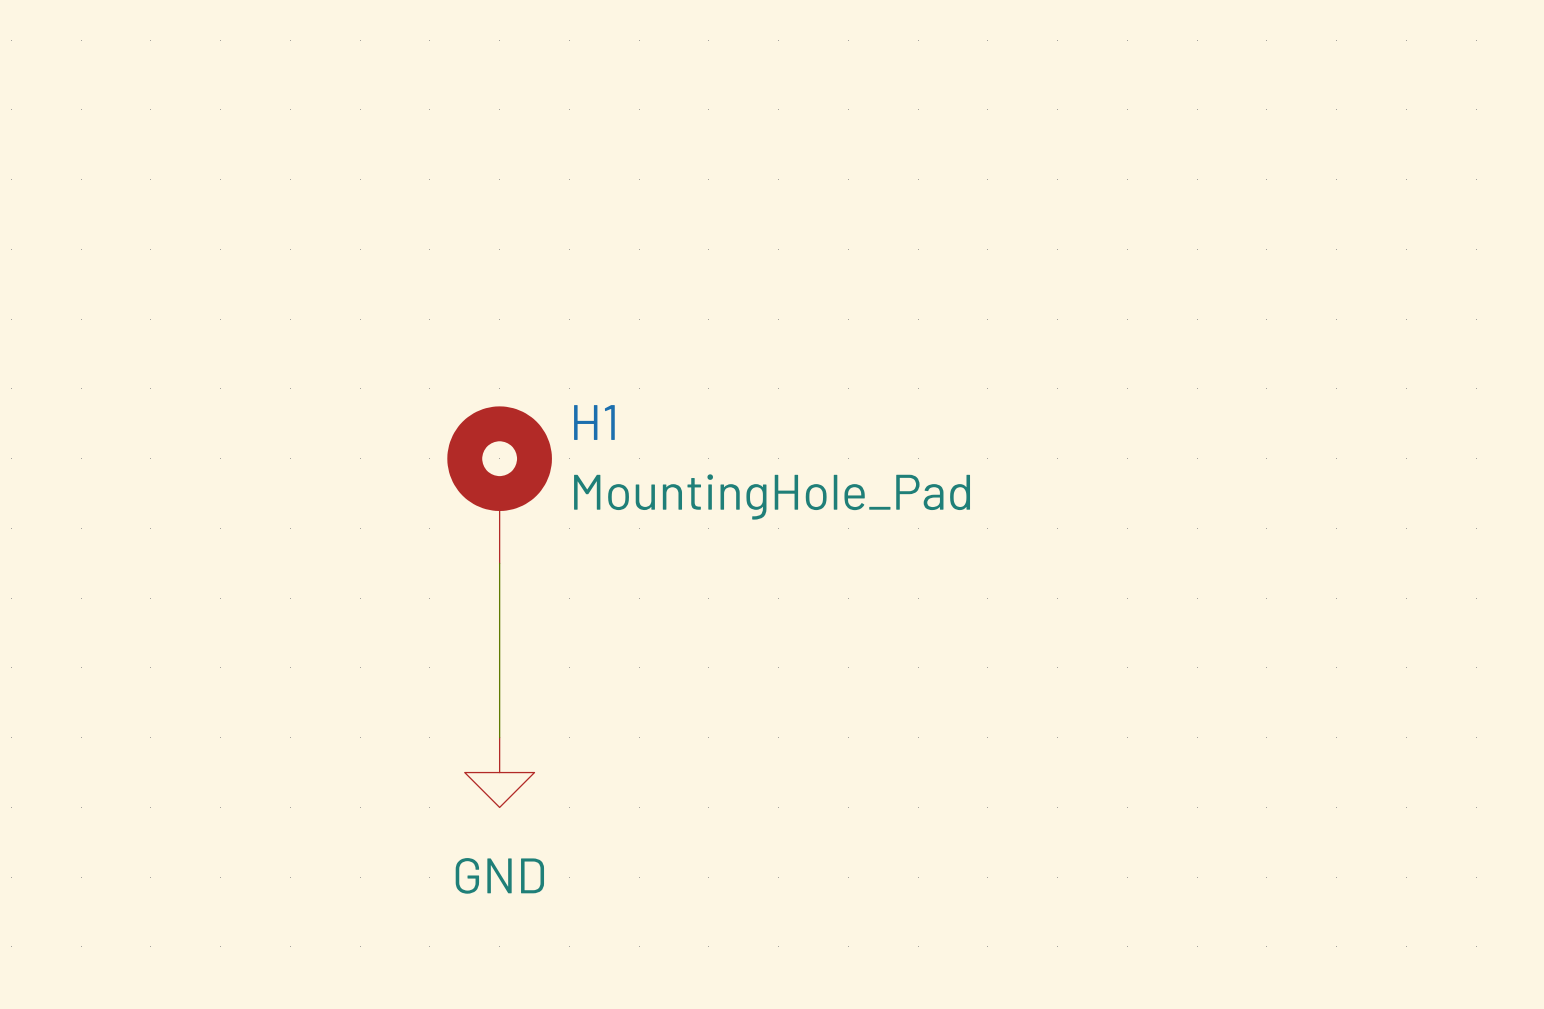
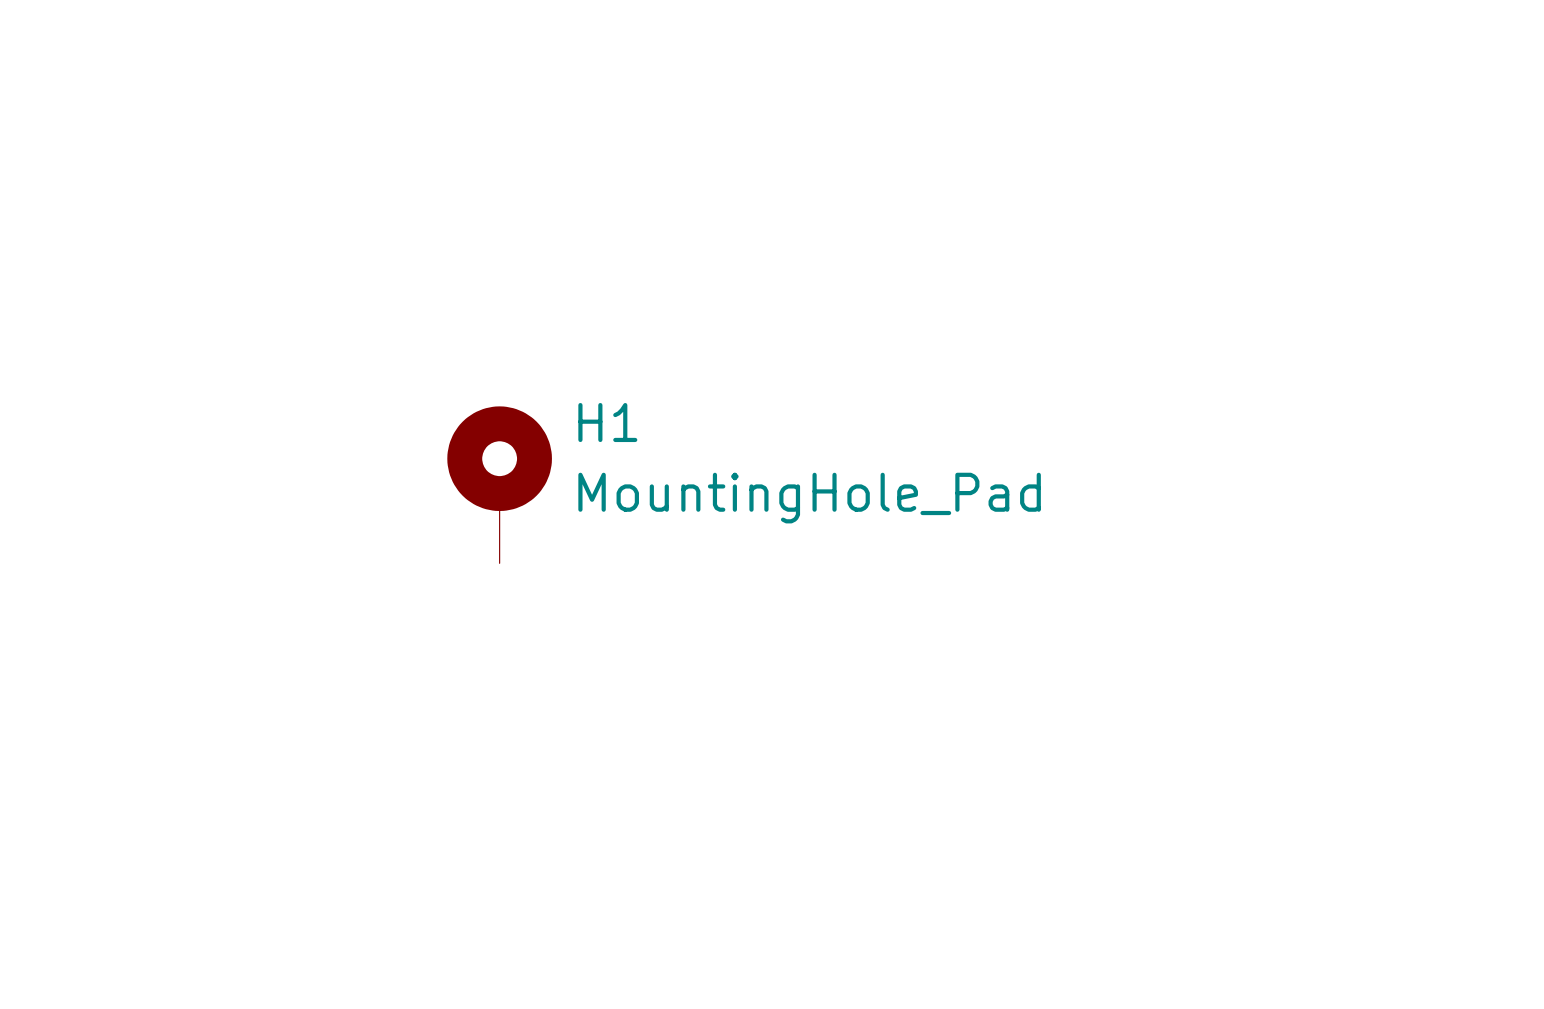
wire: (499, 563) (499, 737) -> none
power symbol: GND (499, 772) -> none

